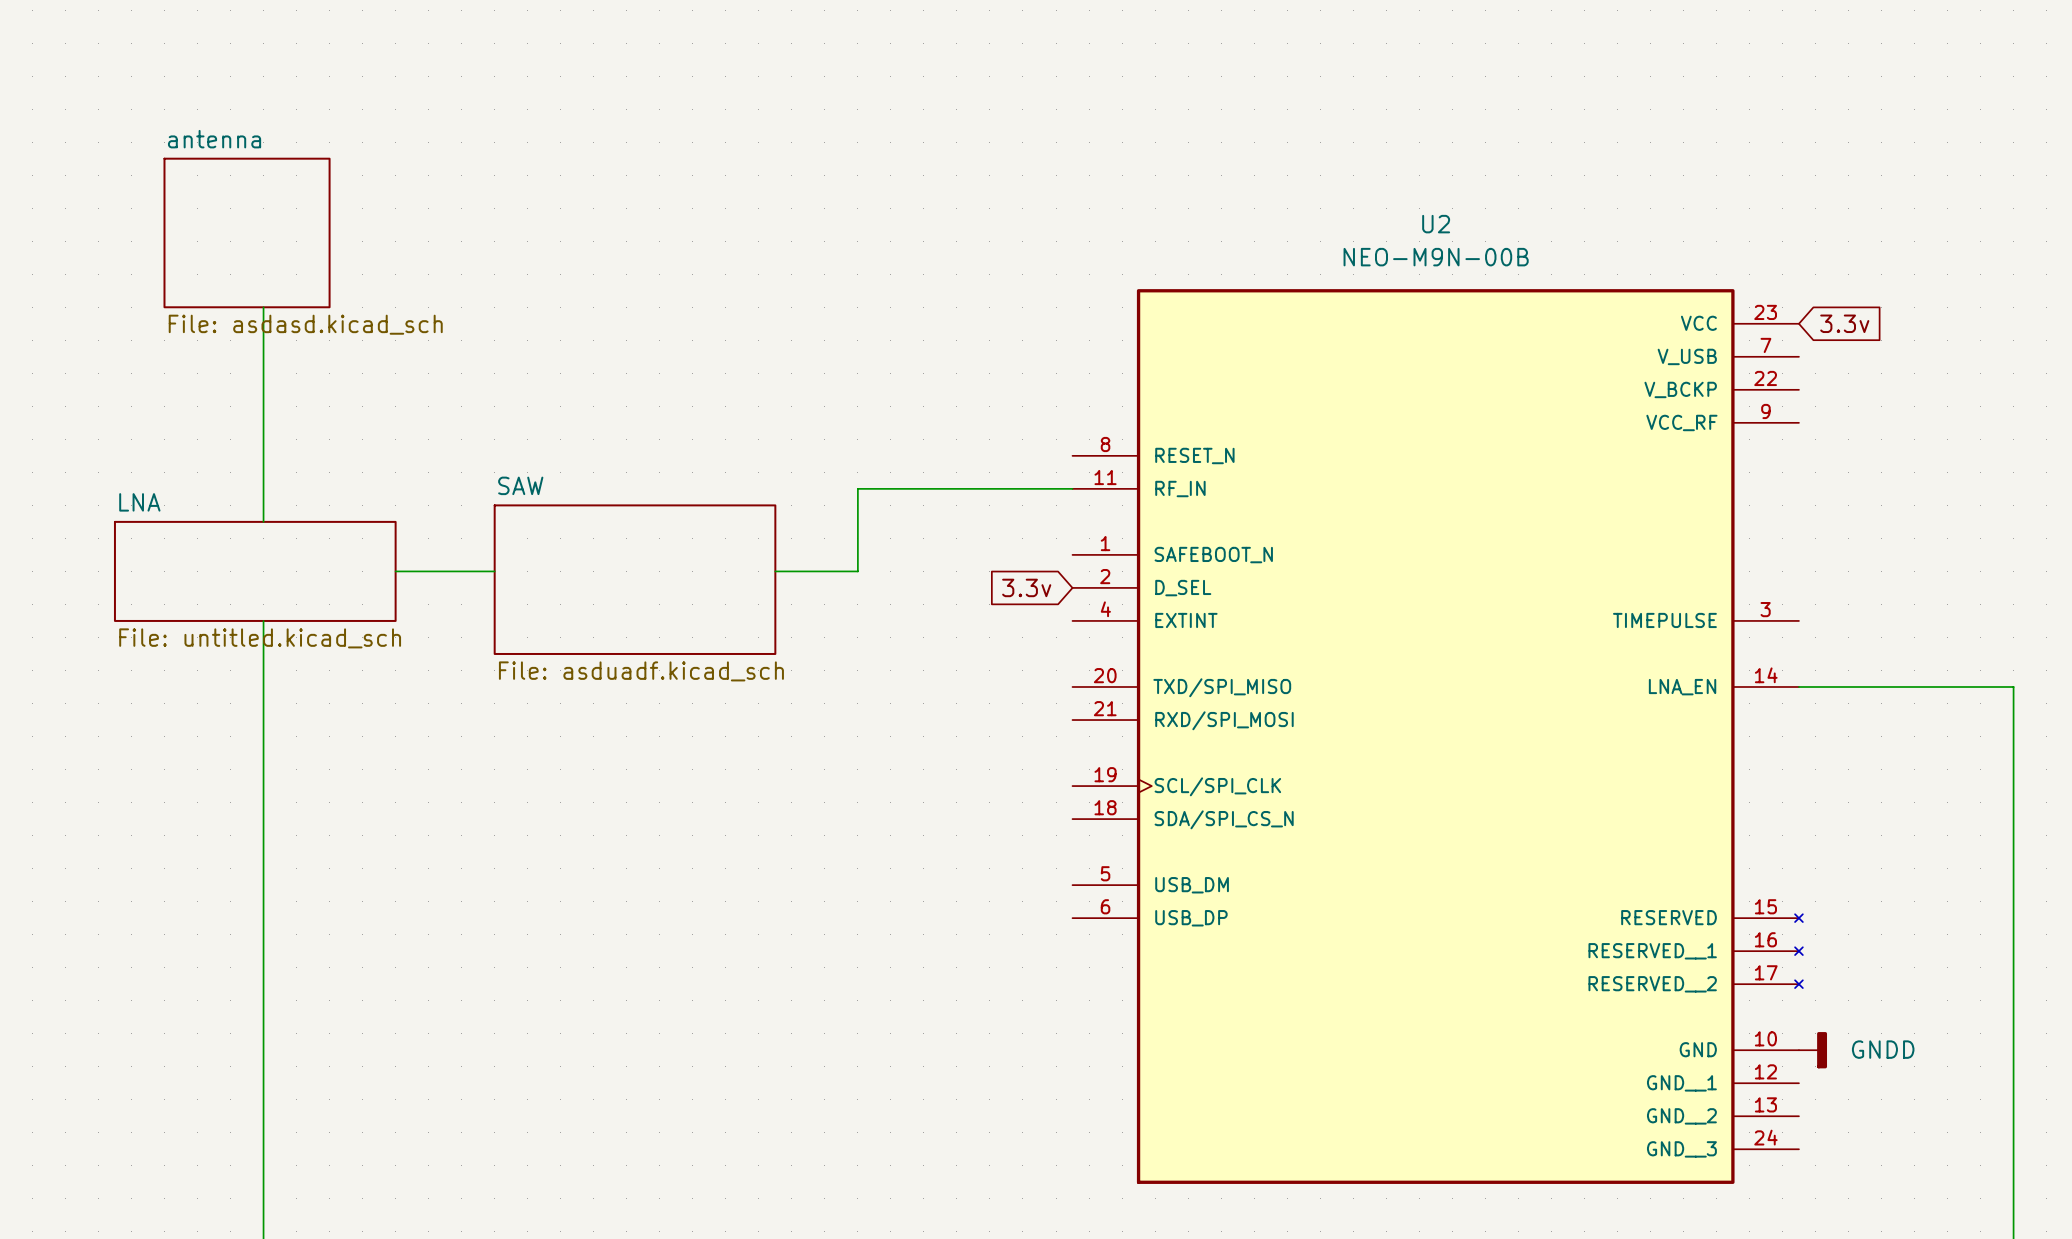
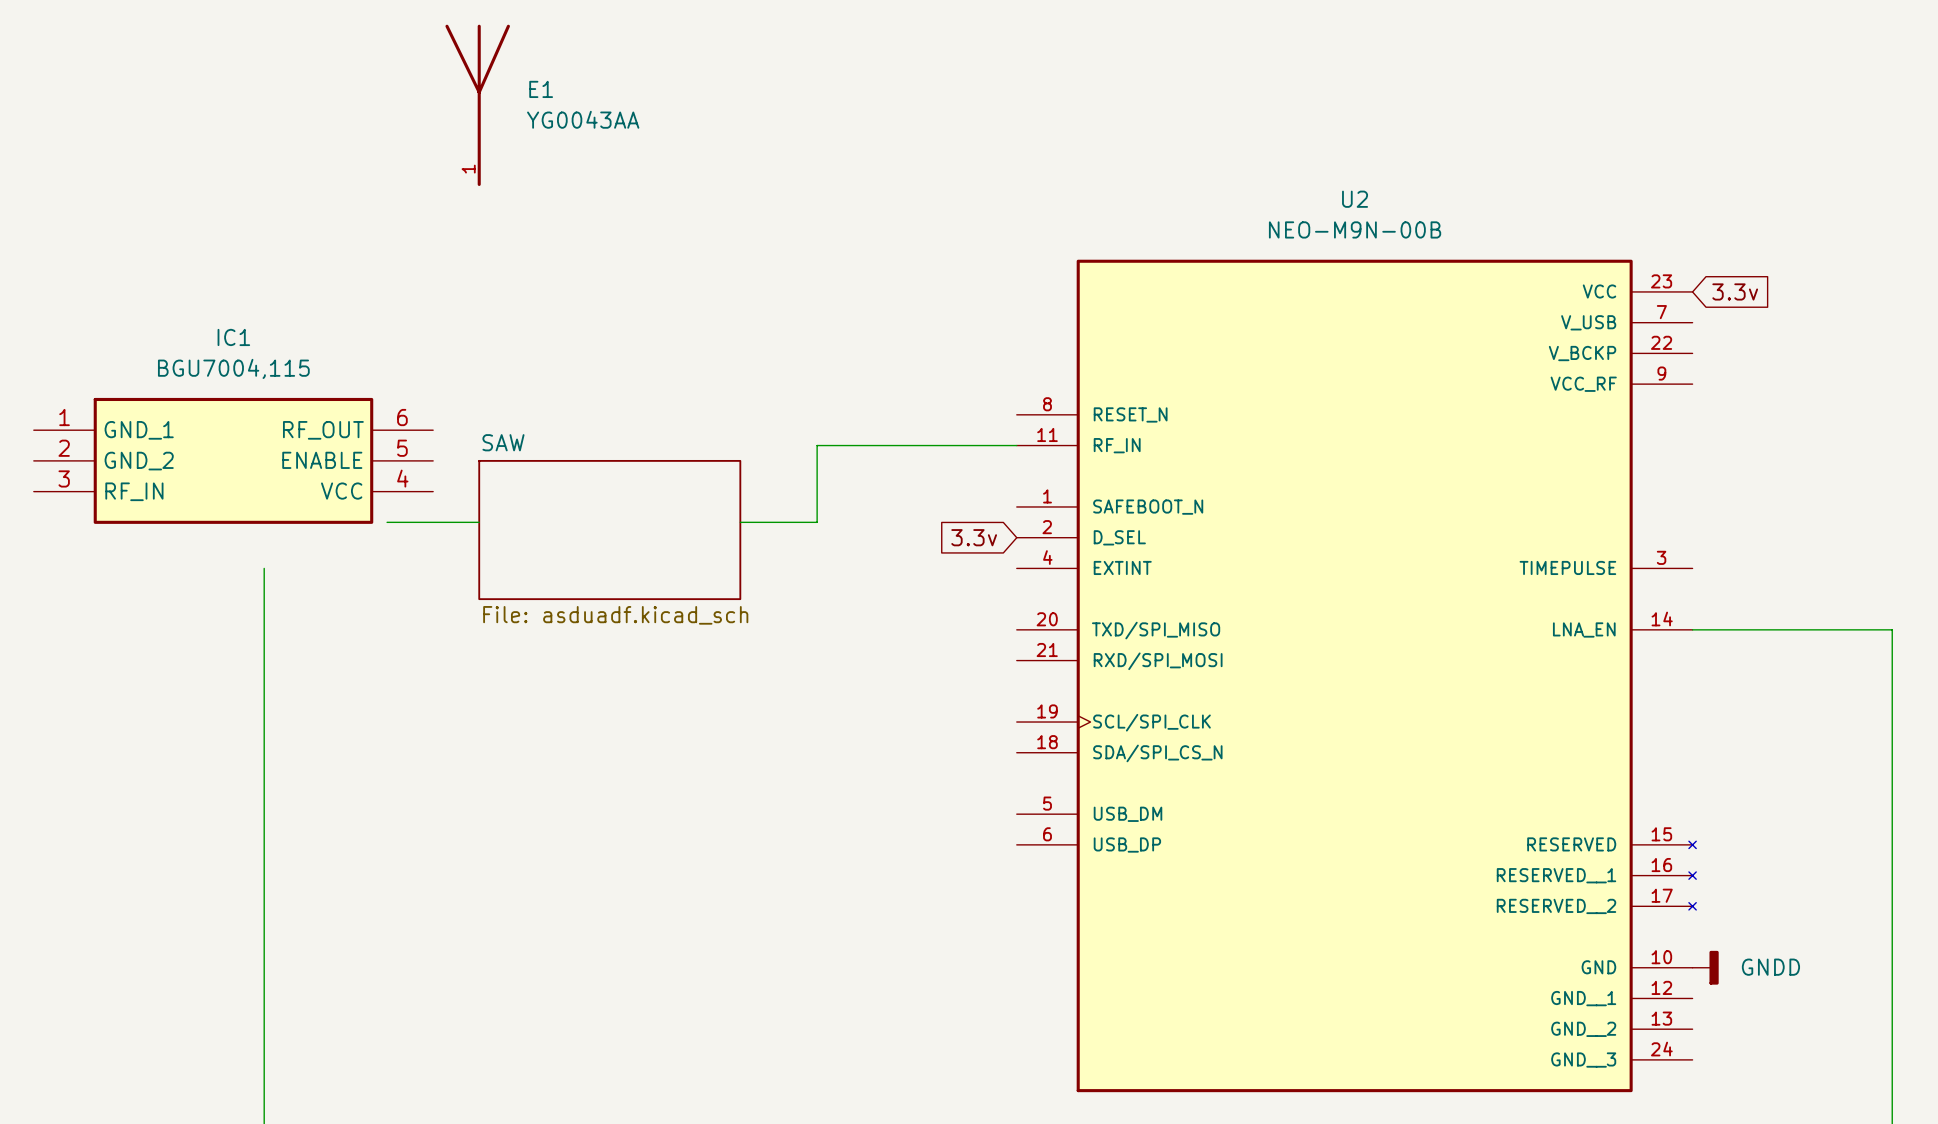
E1: none -> YG0043AA (477, 105)
sheet antenna: File: asdasd.kicad_sch (247, 232) -> none
wire: (263, 307) (263, 521) -> none
IC1: none -> BGU7004,115 (233, 460)
sheet LNA: File: untitled.kicad_sch (255, 571) -> none

